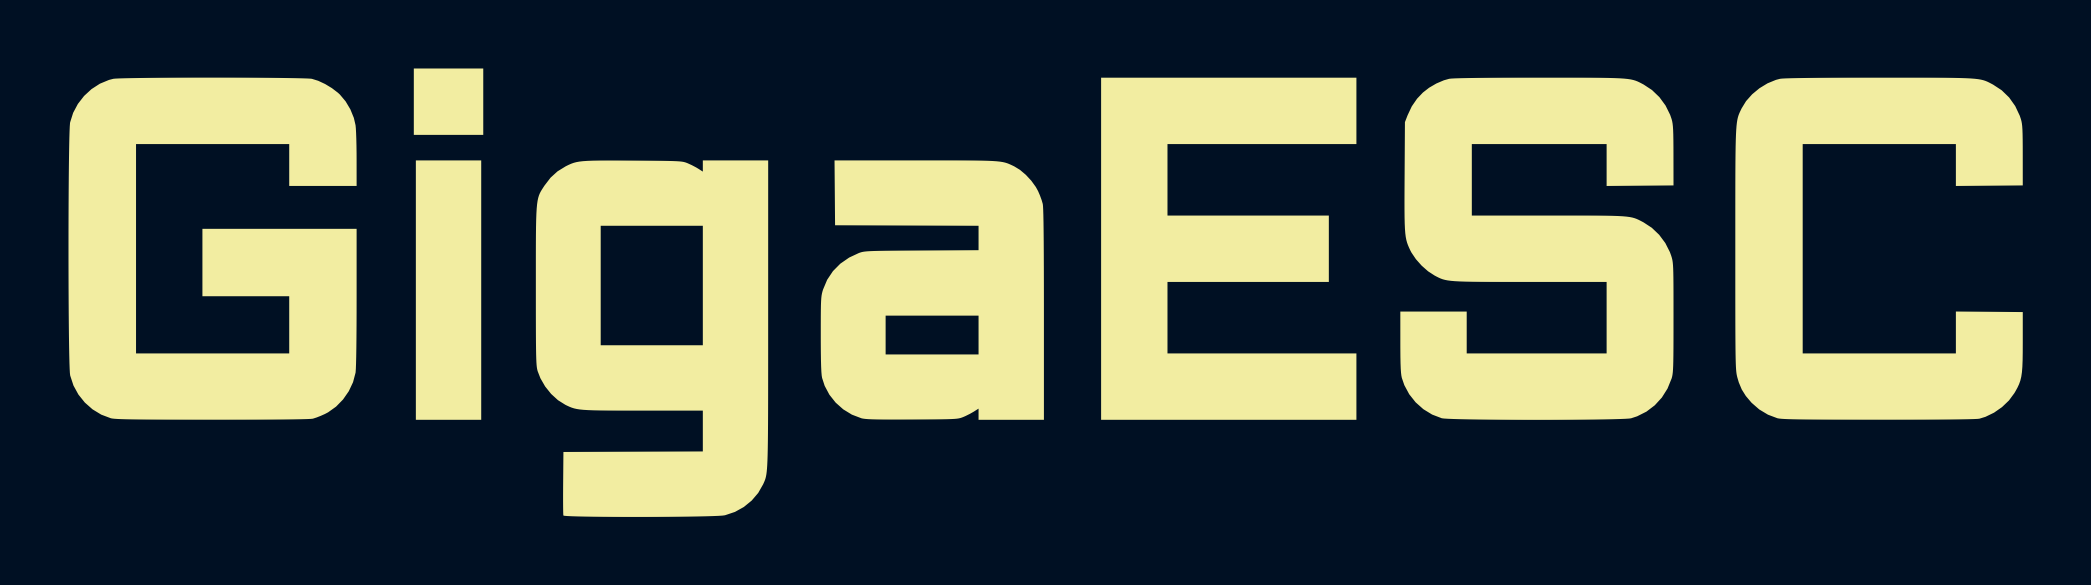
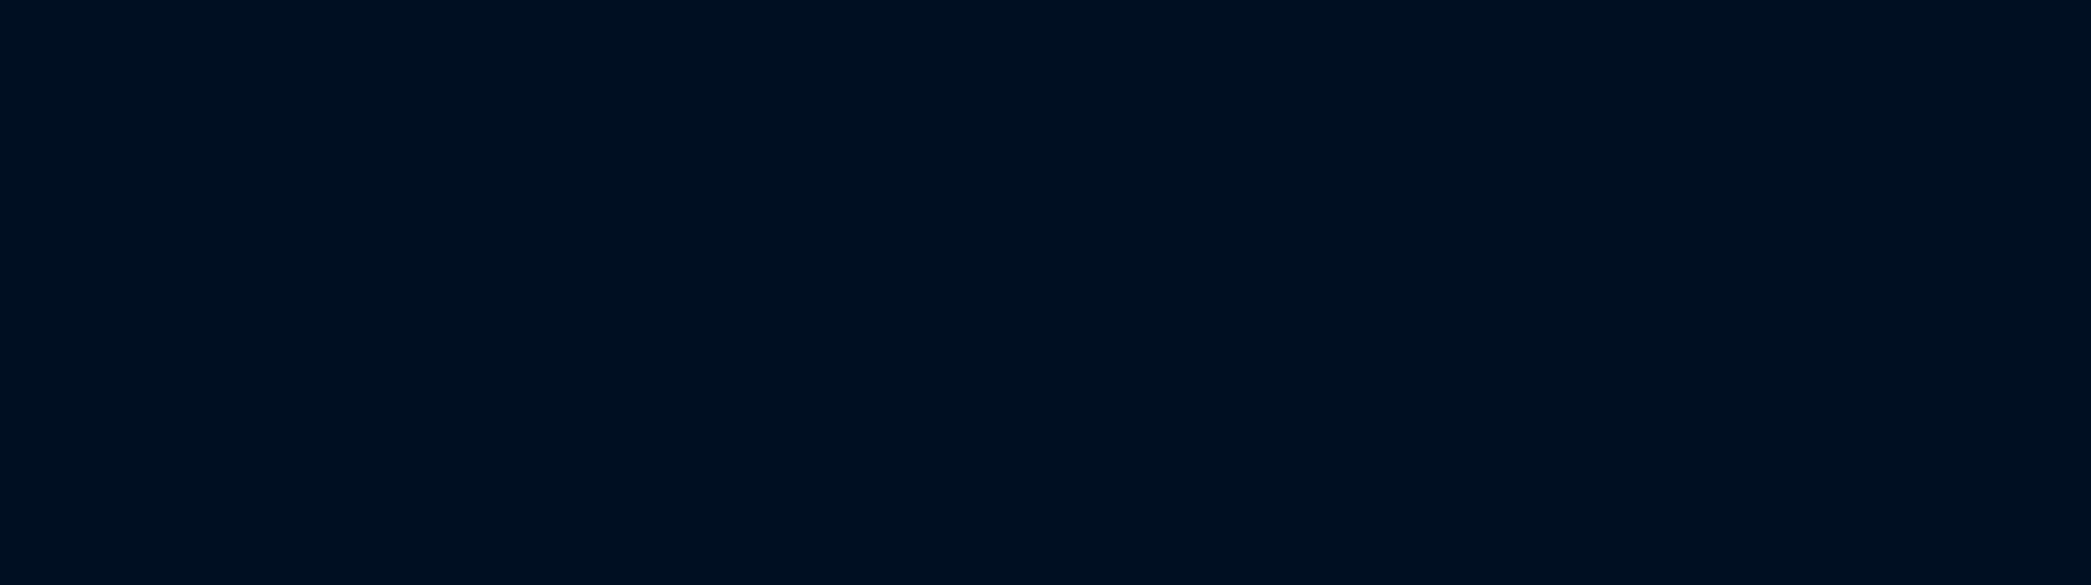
drawing: [68, 68, 2023, 517] -> none

